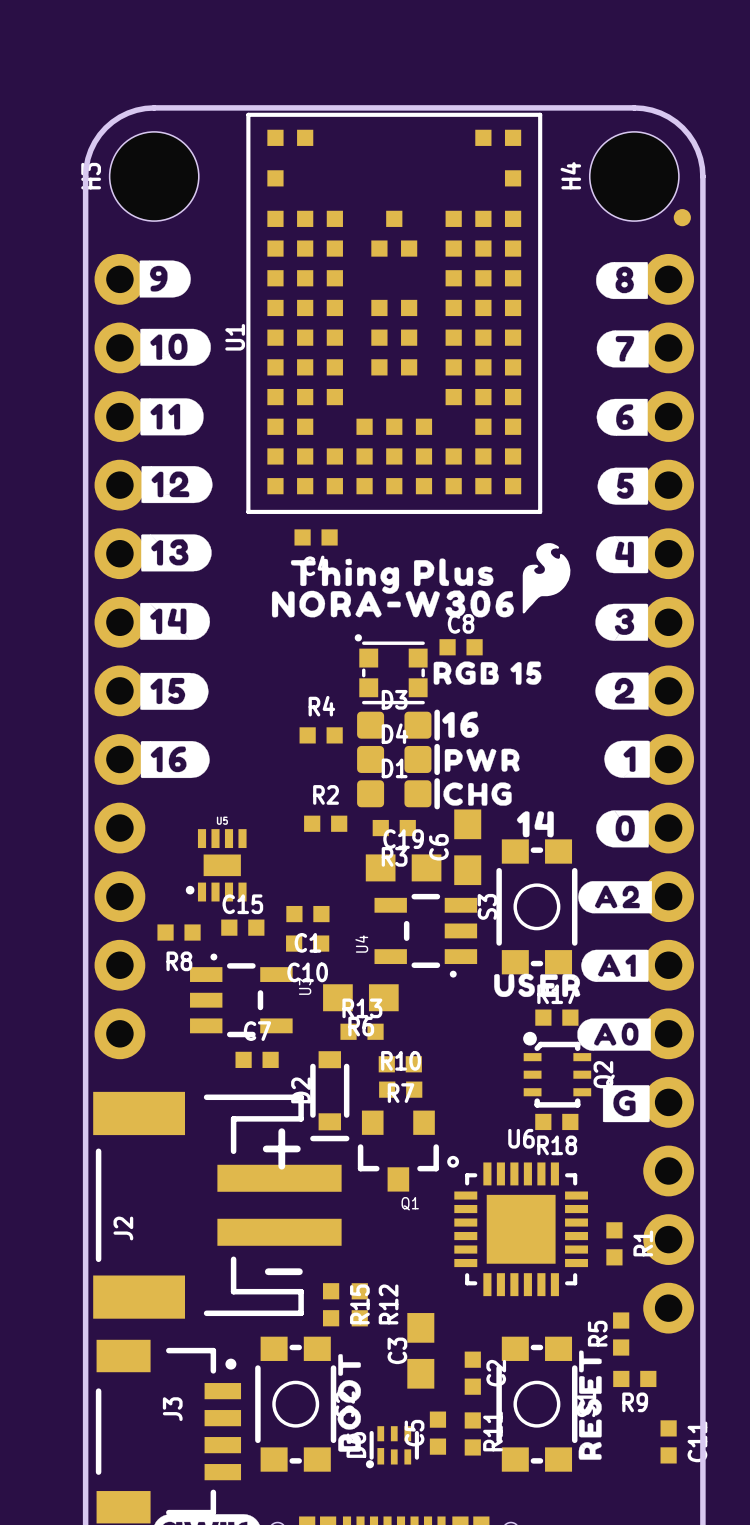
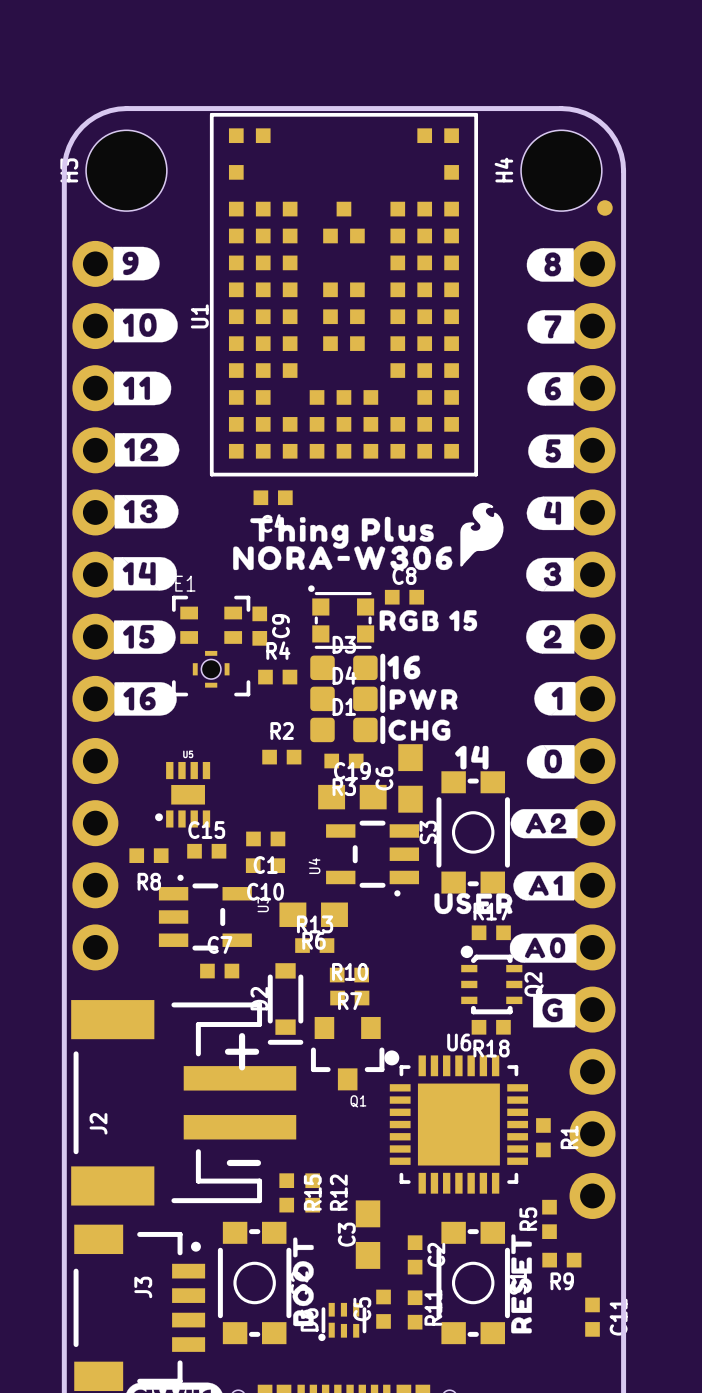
C9: none -> (259, 626)
E1: none -> (211, 646)
U6 footprint: [447, 1155, 588, 1297] -> [384, 1050, 529, 1194]

